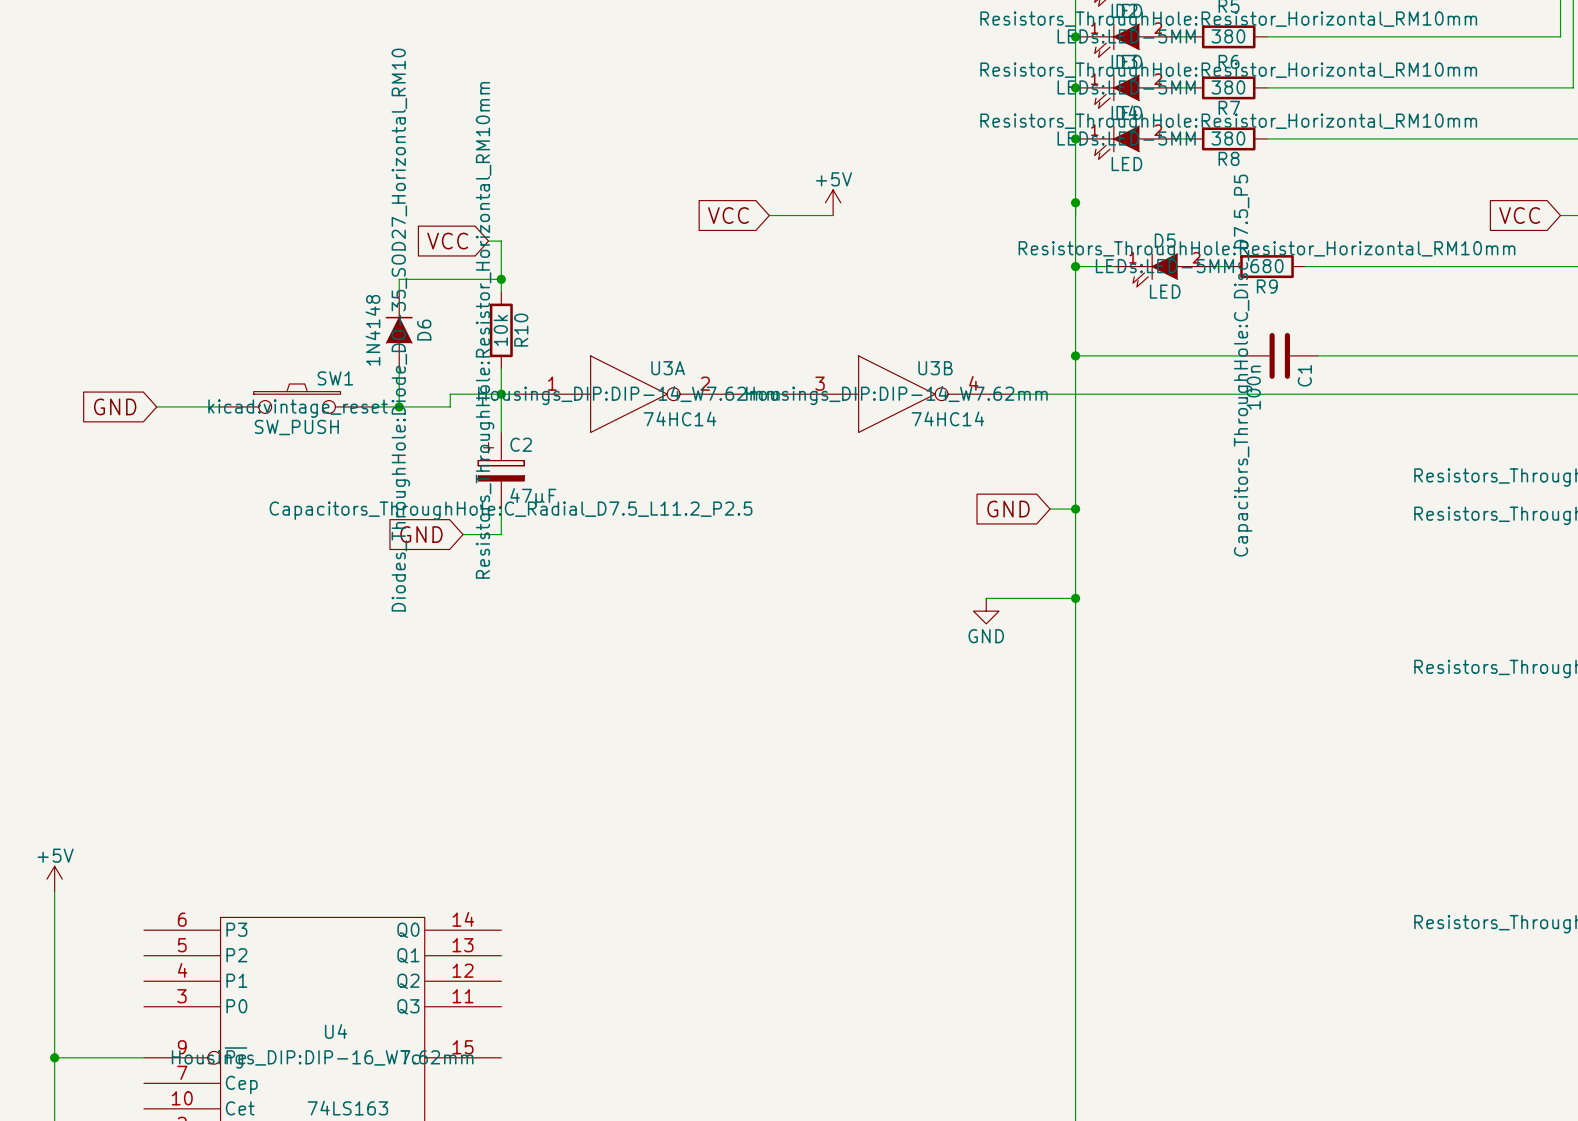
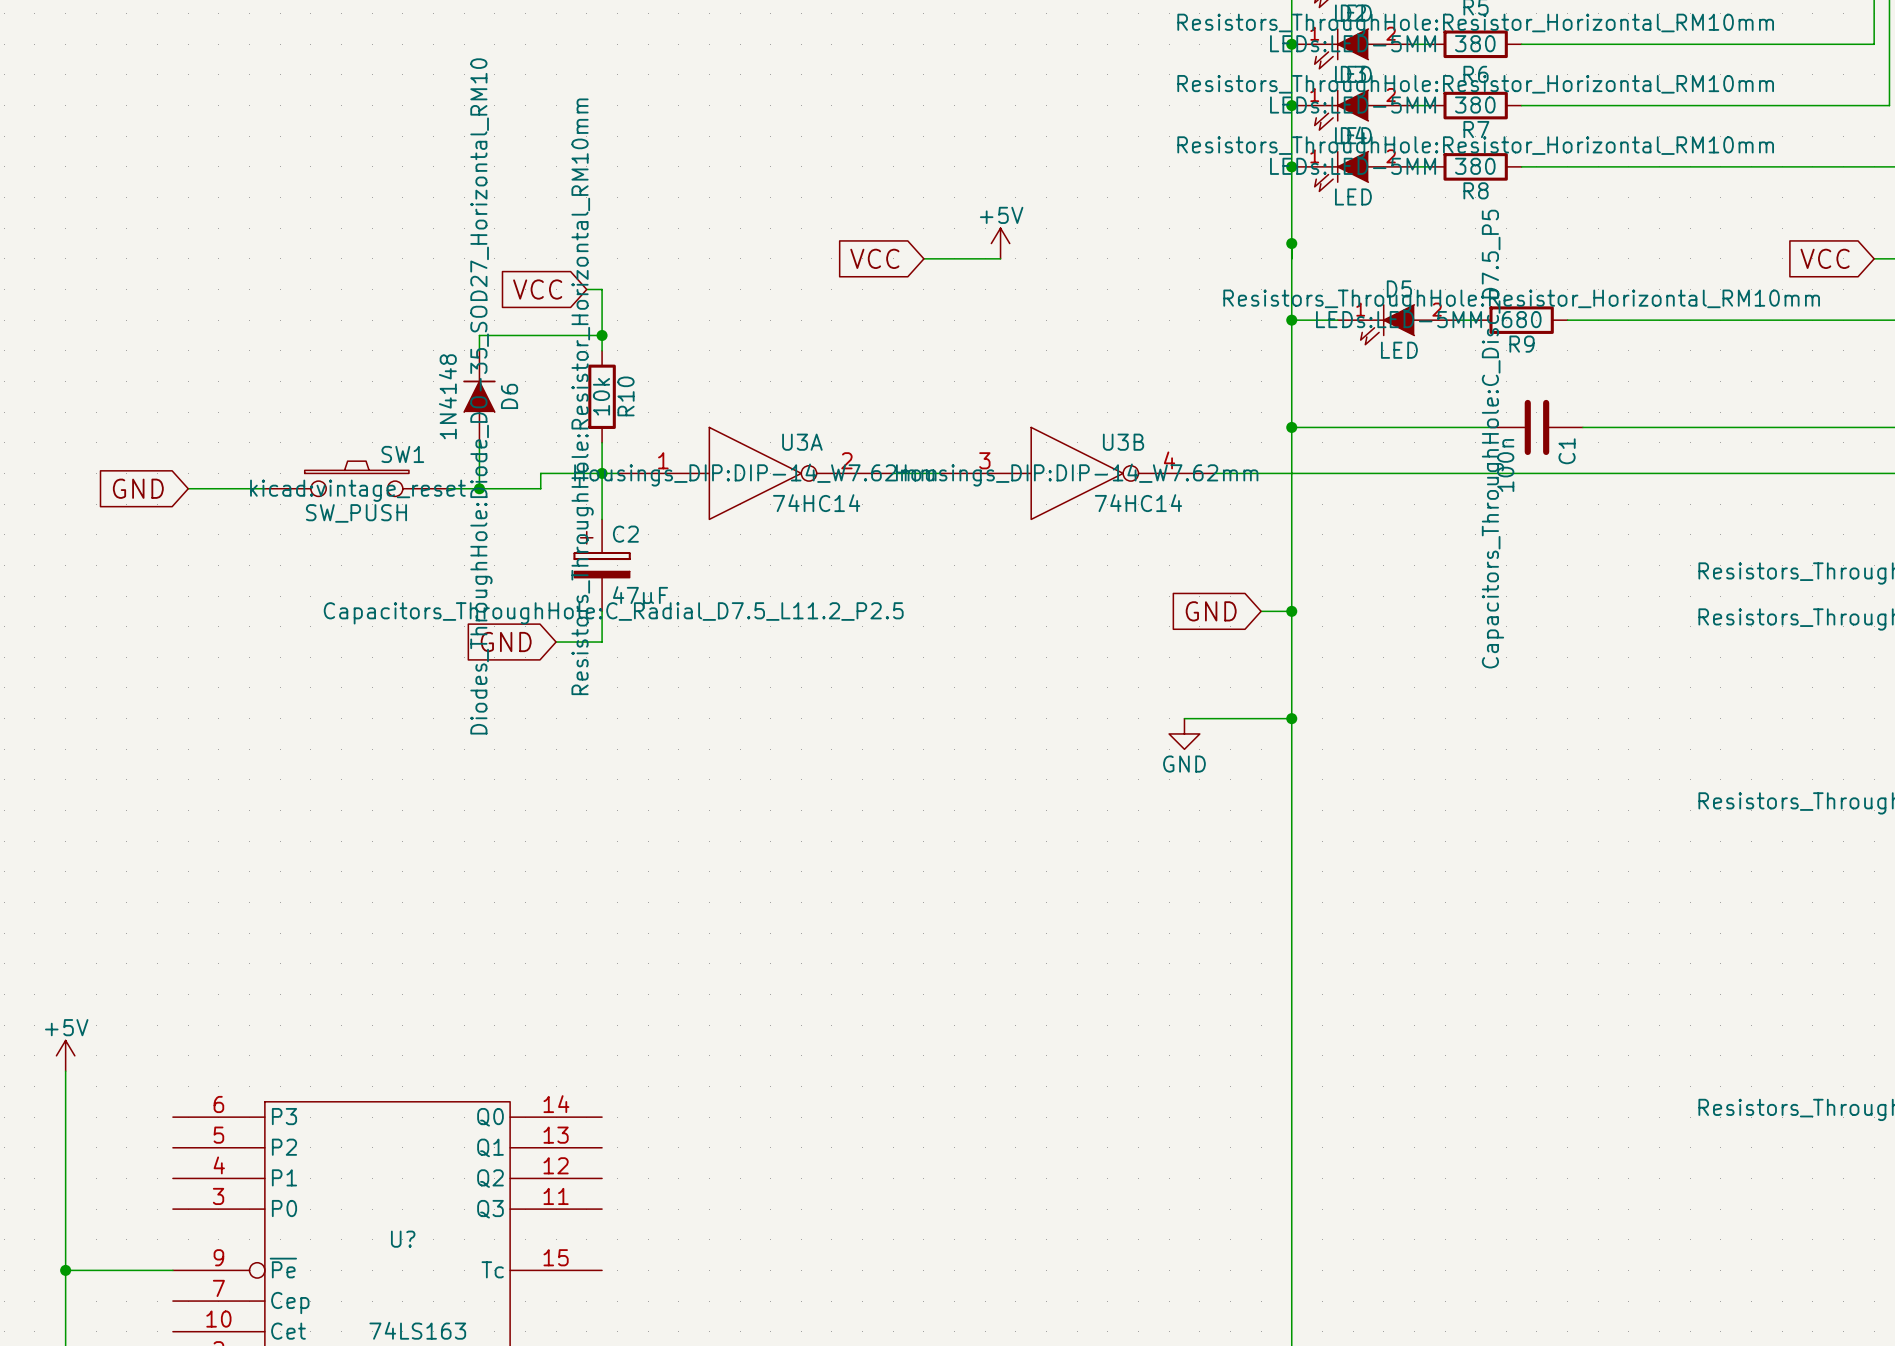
U4 name: U4 (336, 1031) -> U? (403, 1239)
U4 text: Housings_DIP:DIP-16_W7.62mm (322, 1059) -> none

